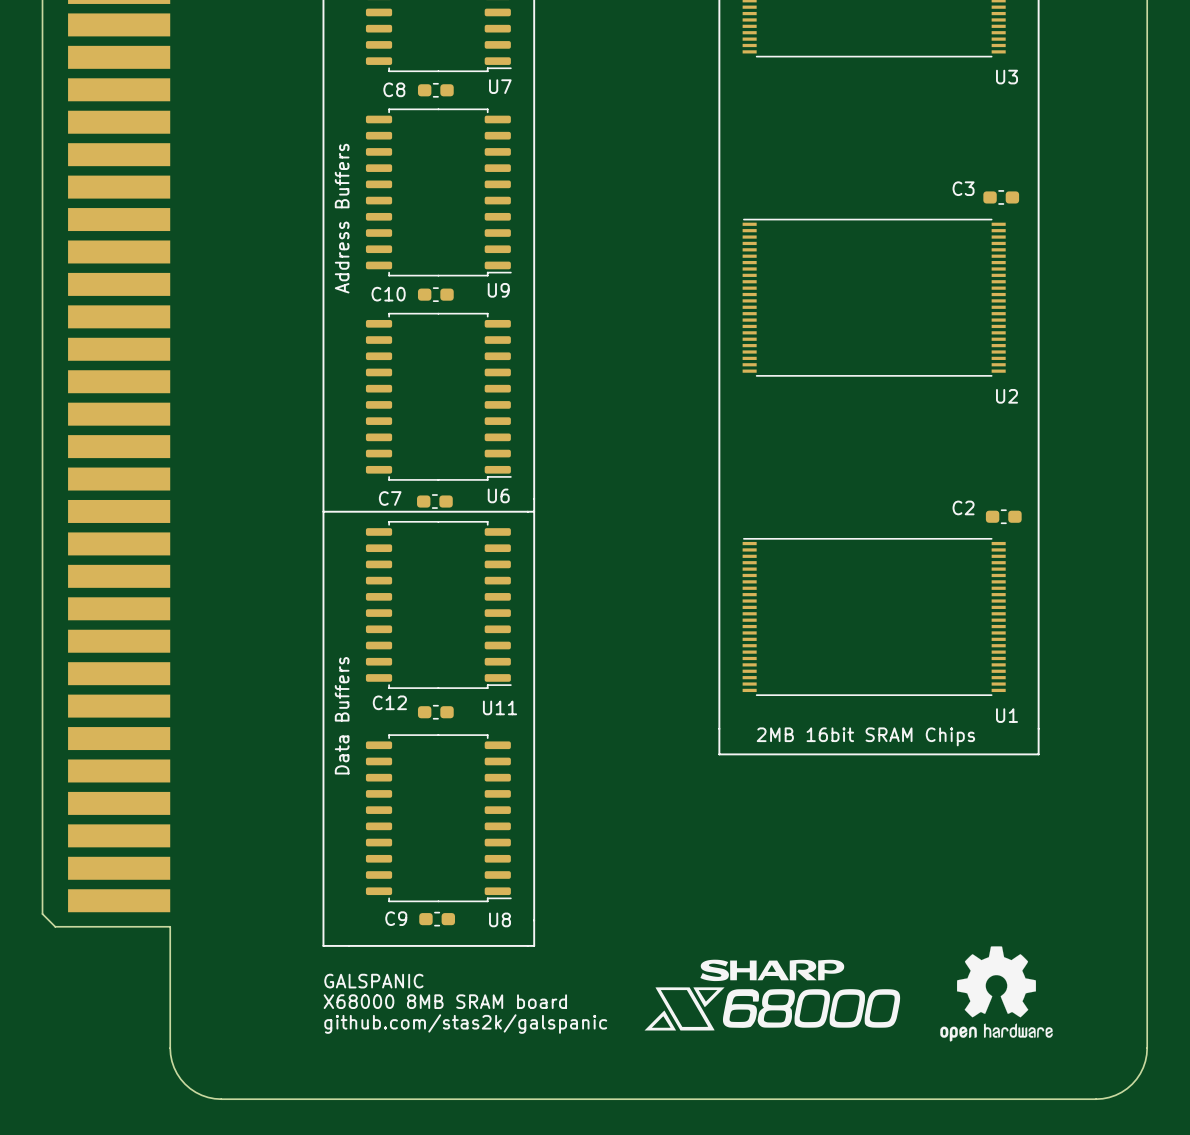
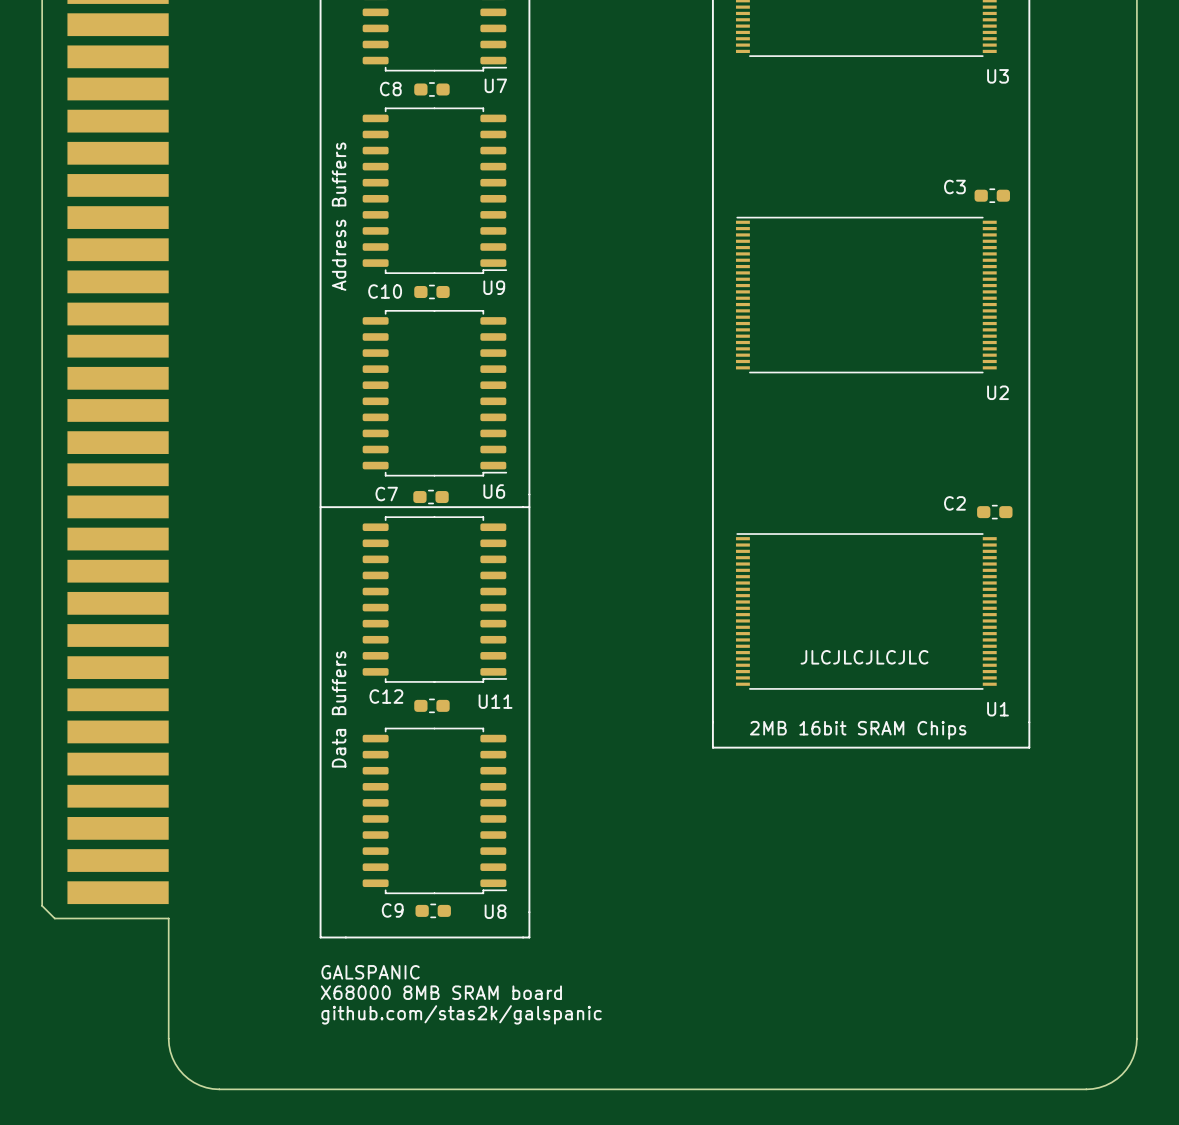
text: none -> JLCJLCJLCJLC (864, 657)
drawing: [940, 946, 1053, 1042] -> none
drawing: [644, 959, 901, 1031] -> none

